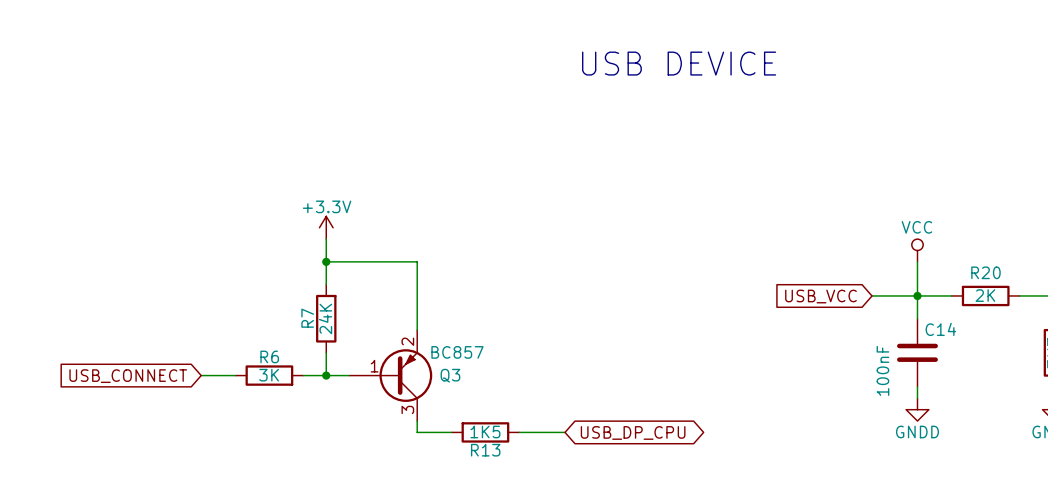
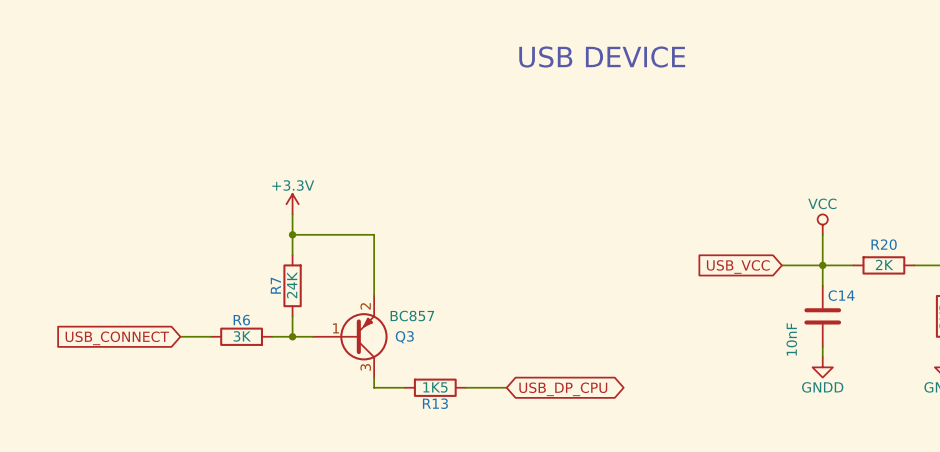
C14 value: 100nF (882, 370) -> 10nF (791, 339)

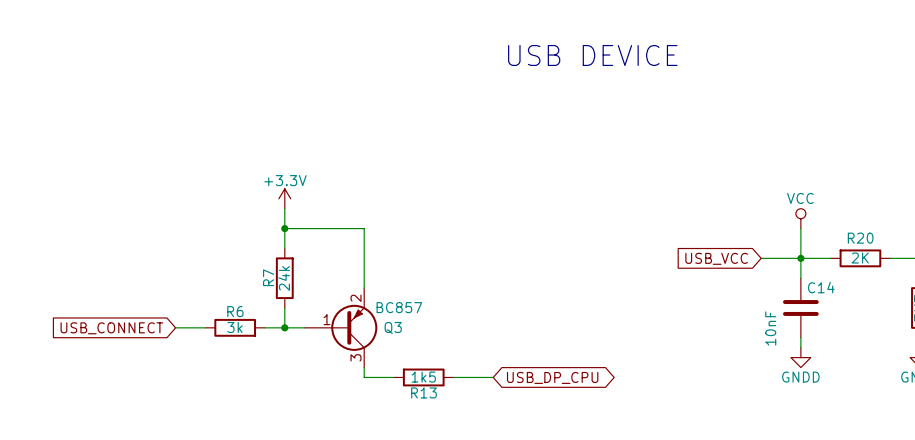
R7 value: 24K (292, 285) -> 24k (284, 278)
R6 value: 3K (242, 336) -> 3k (234, 327)
R13 value: 1K5 (435, 387) -> 1k5 (423, 377)

